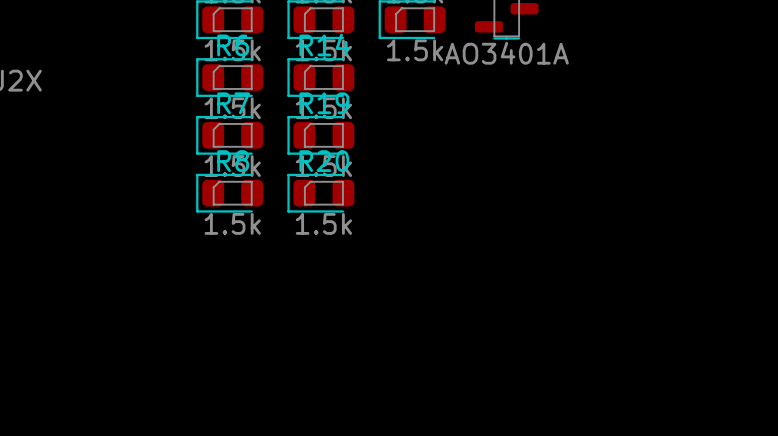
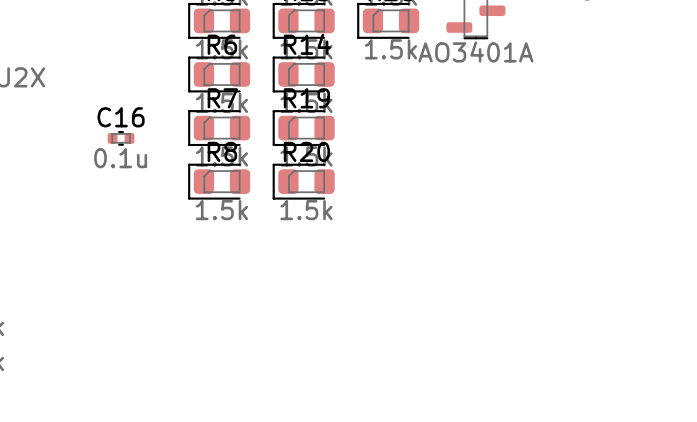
C16: none -> 0.1u (121, 138)

